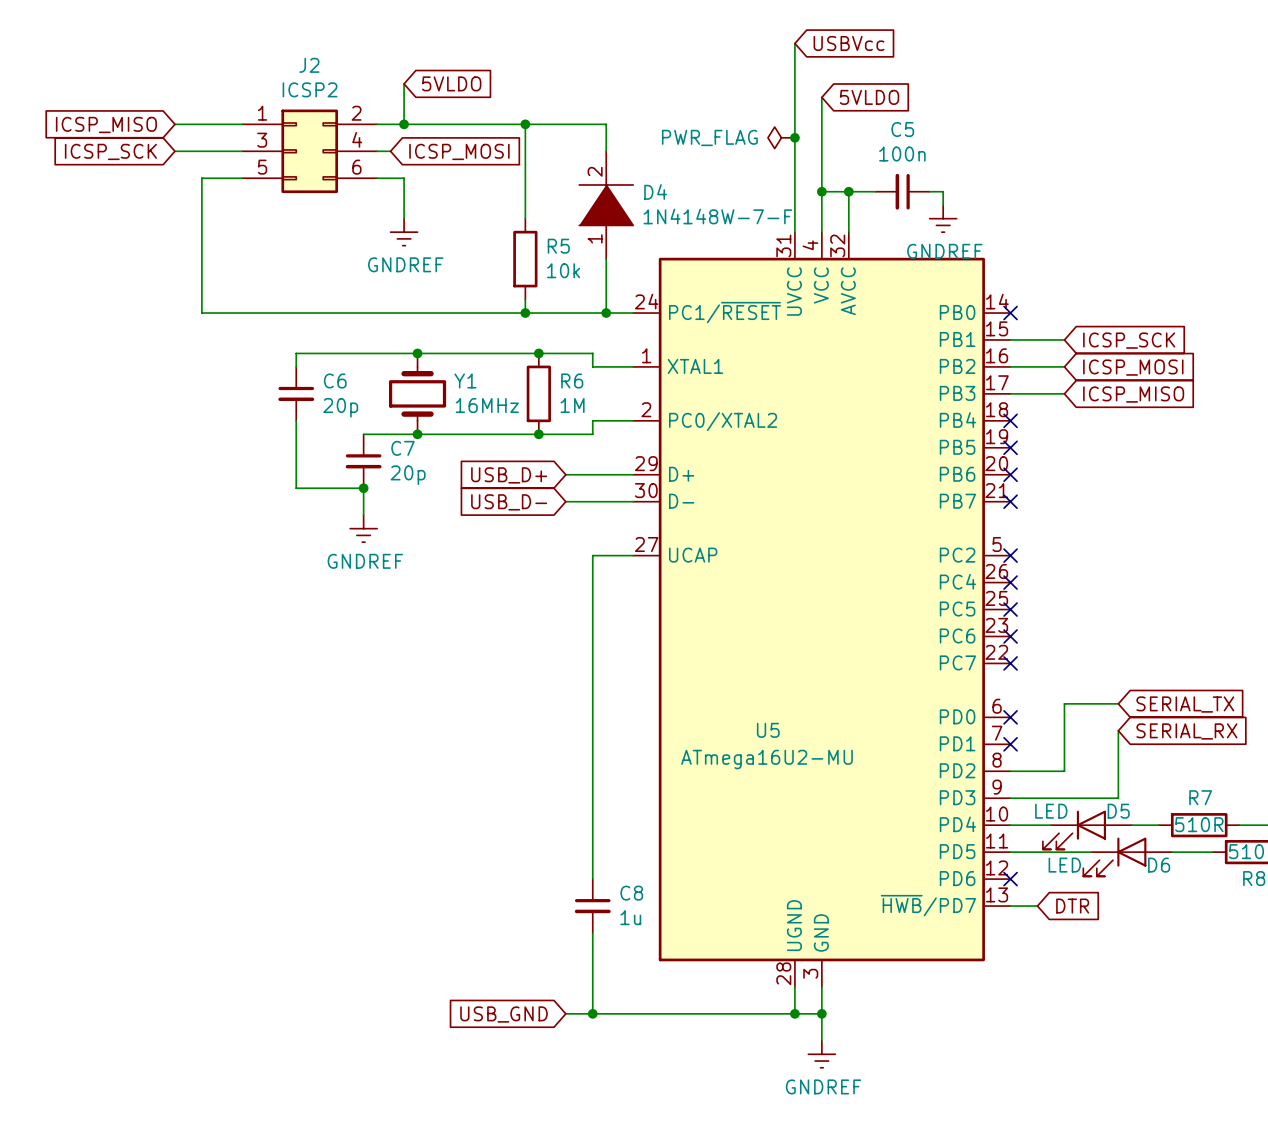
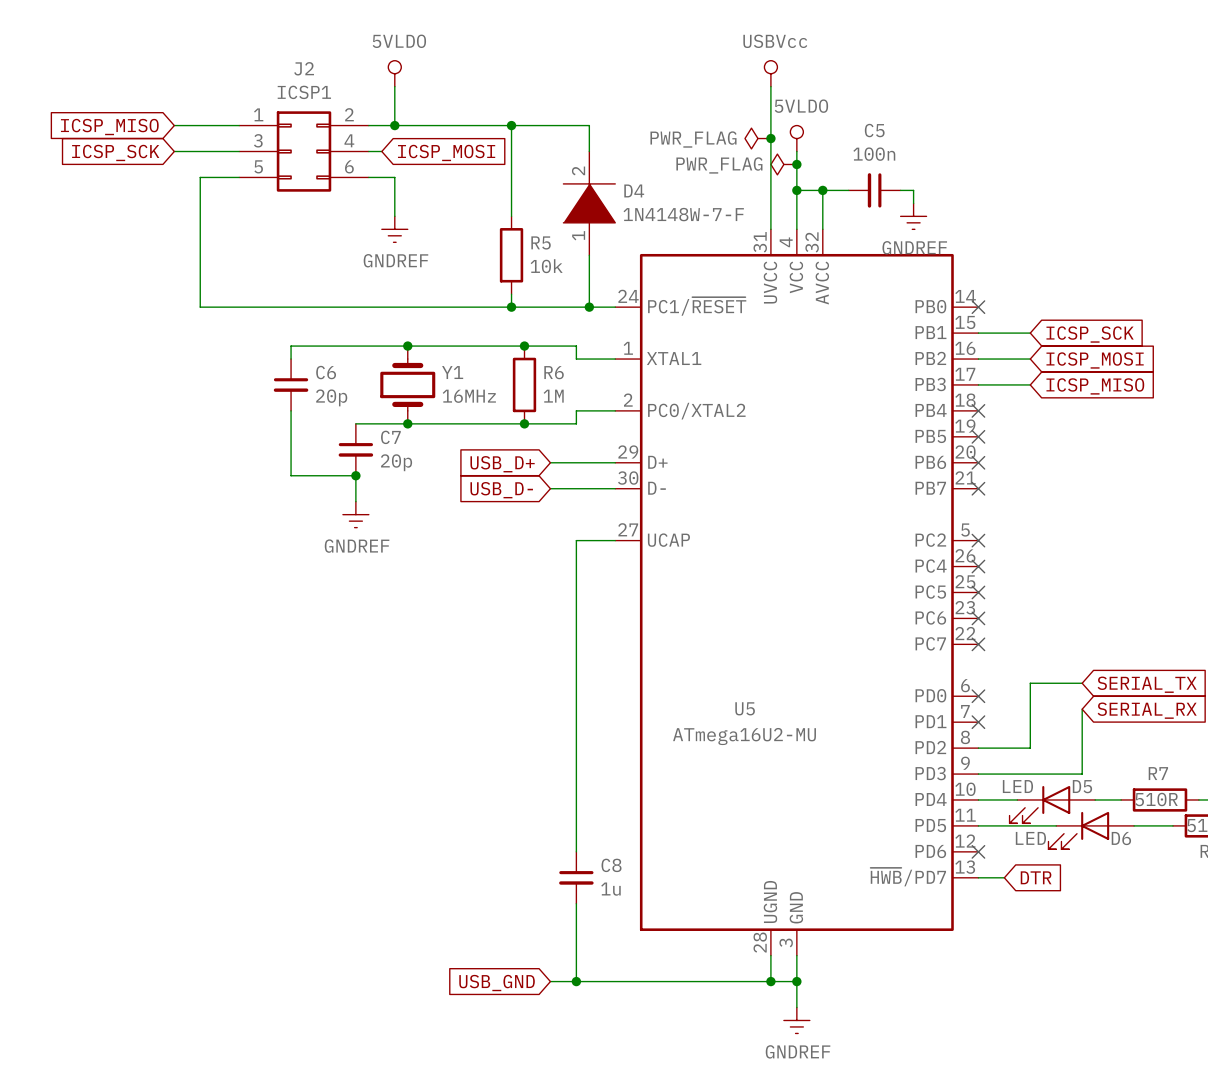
wire: (794, 43) (794, 83) -> none
global label: USBVcc (849, 43) -> none
power symbol: none -> 5VLDO (394, 73)
power symbol: none -> USBVcc (770, 73)
global label: 5VLDO (451, 83) -> none
J2 value: ICSP2 (310, 89) -> ICSP1 (304, 92)
wire: (821, 97) (821, 151) -> none
global label: 5VLDO (869, 97) -> none
power symbol: none -> 5VLDO (796, 138)
power symbol: none -> PWR_FLAG (783, 164)
junction: none -> (796, 164)

